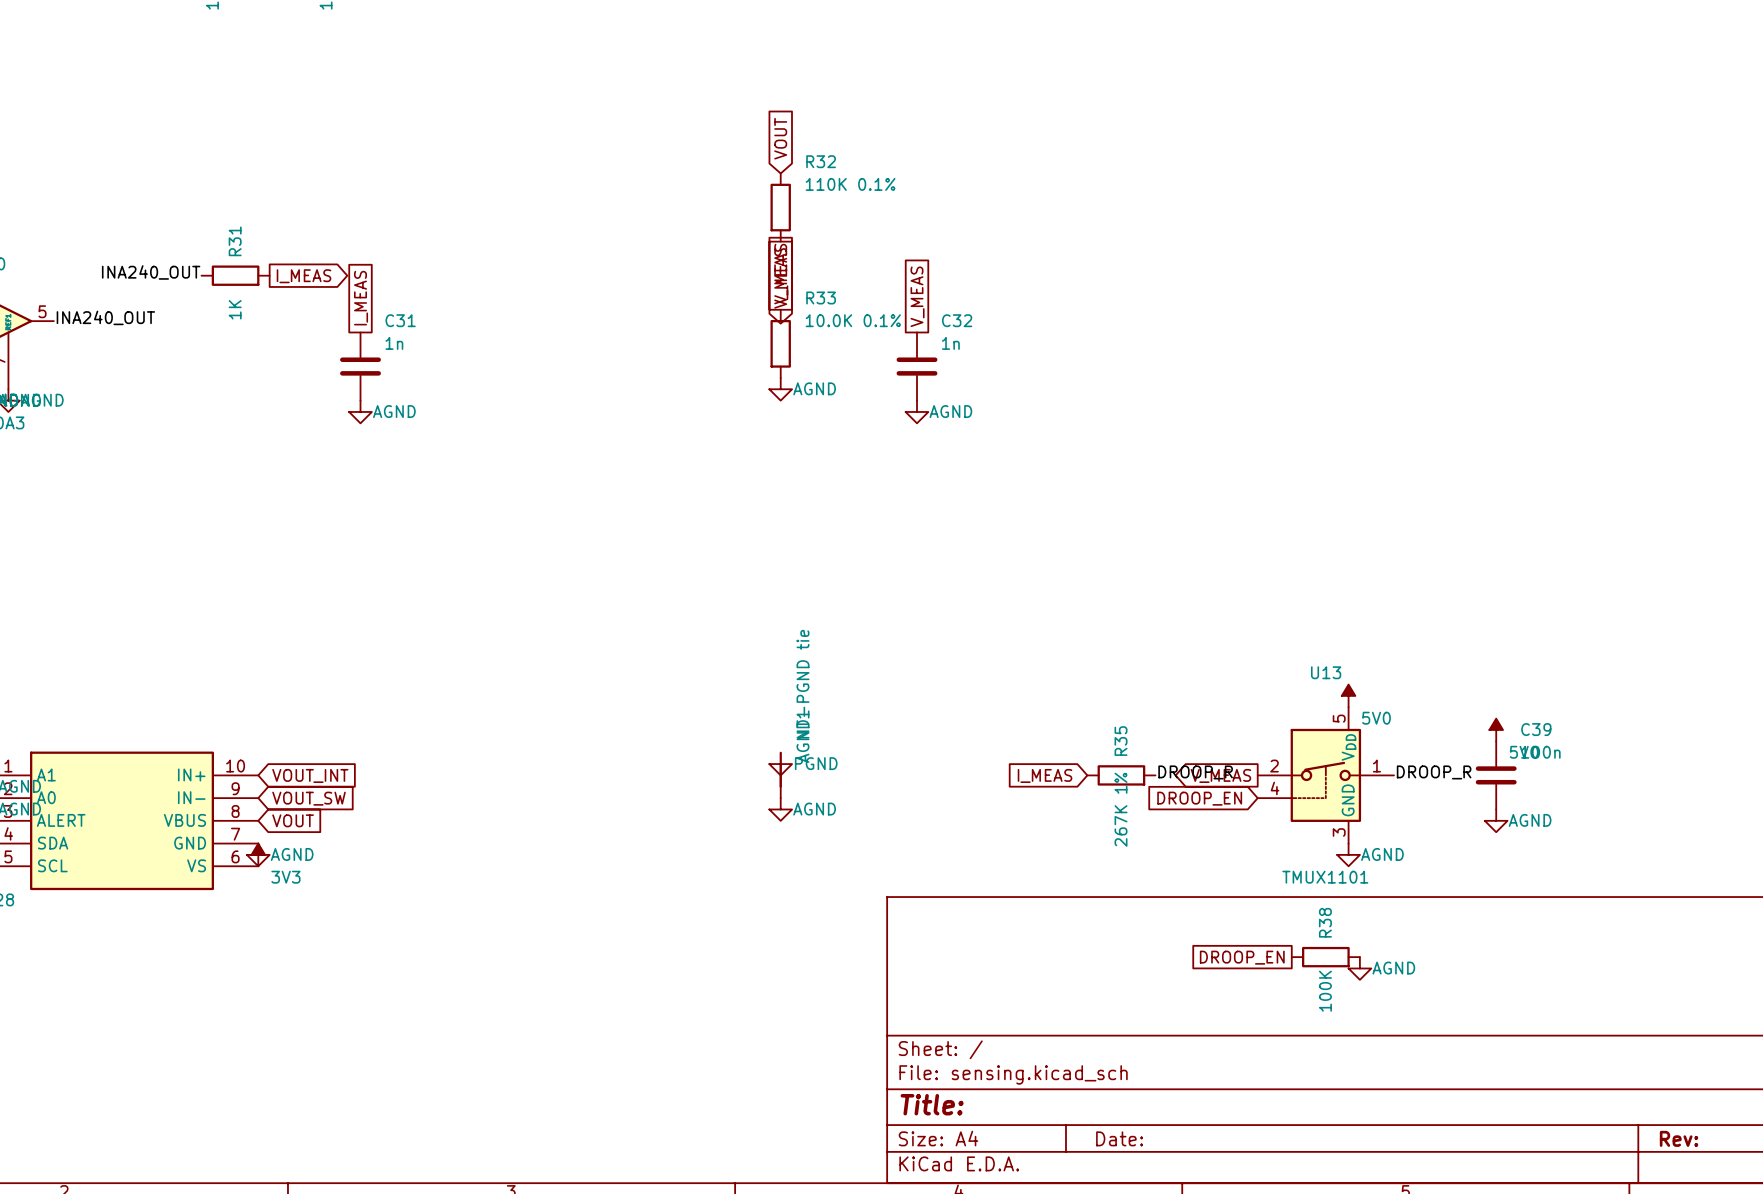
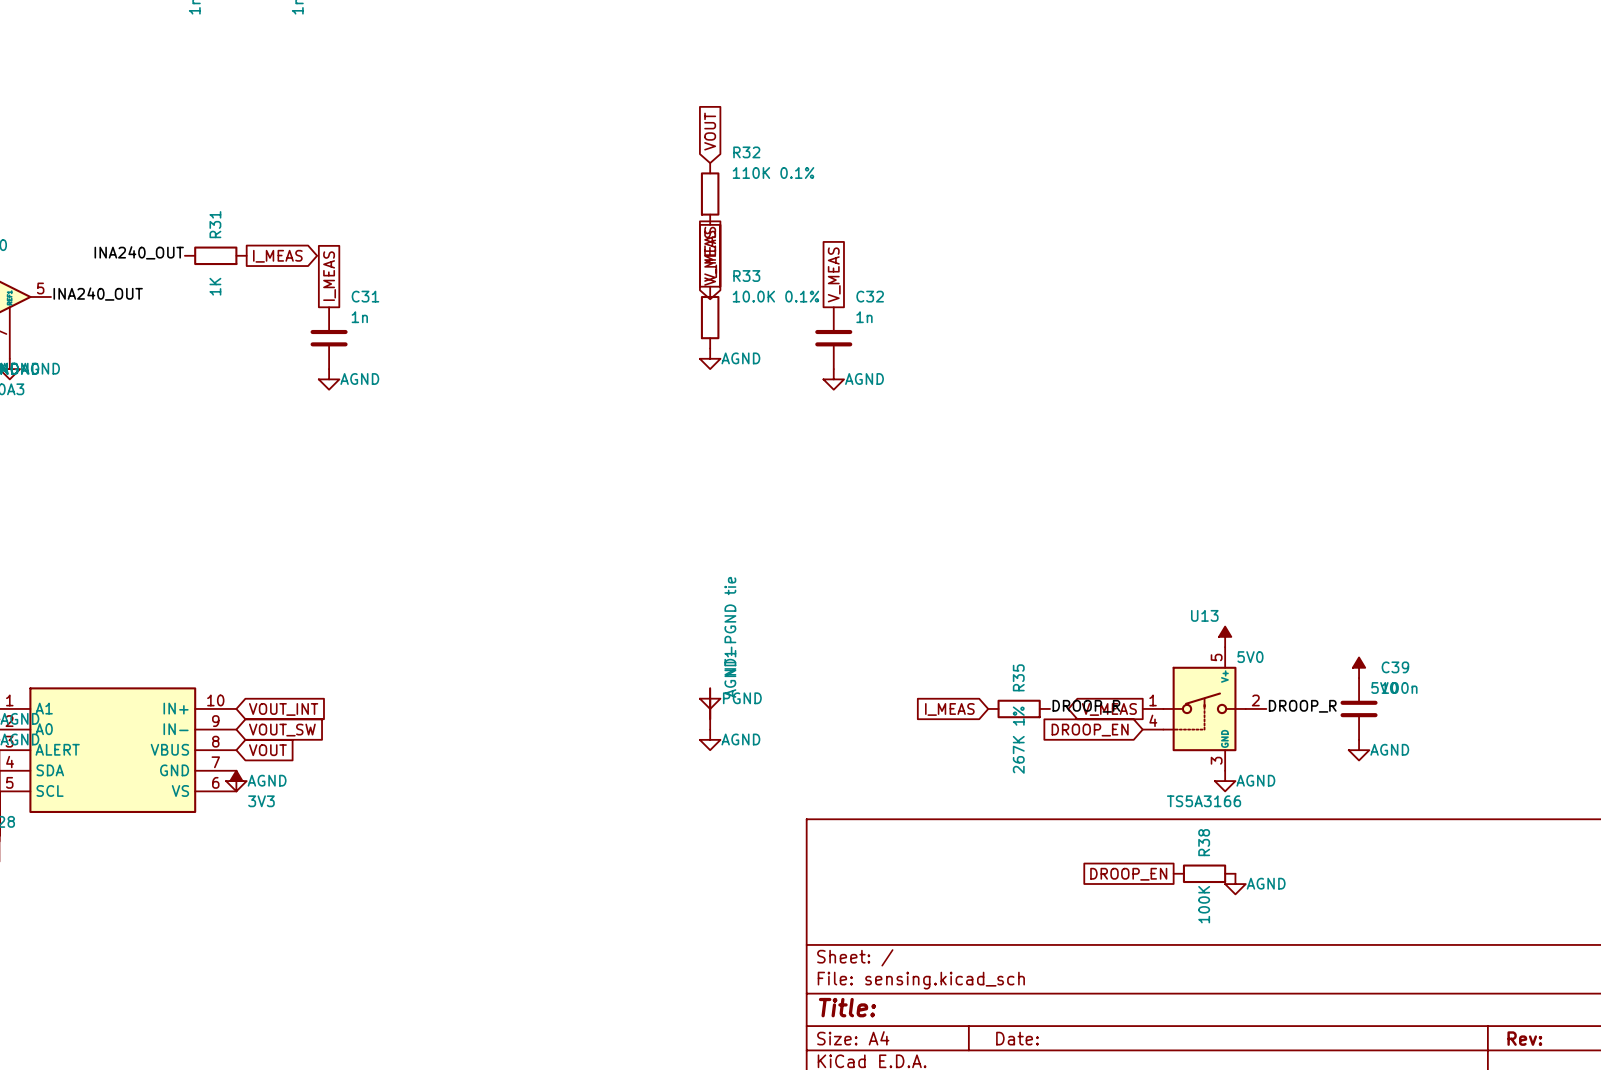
U13 symbol: [1257, 707, 1395, 844] -> [1142, 647, 1267, 771]
U13 value: TMUX1101 (1325, 877) -> TS5A3166 (1204, 801)

